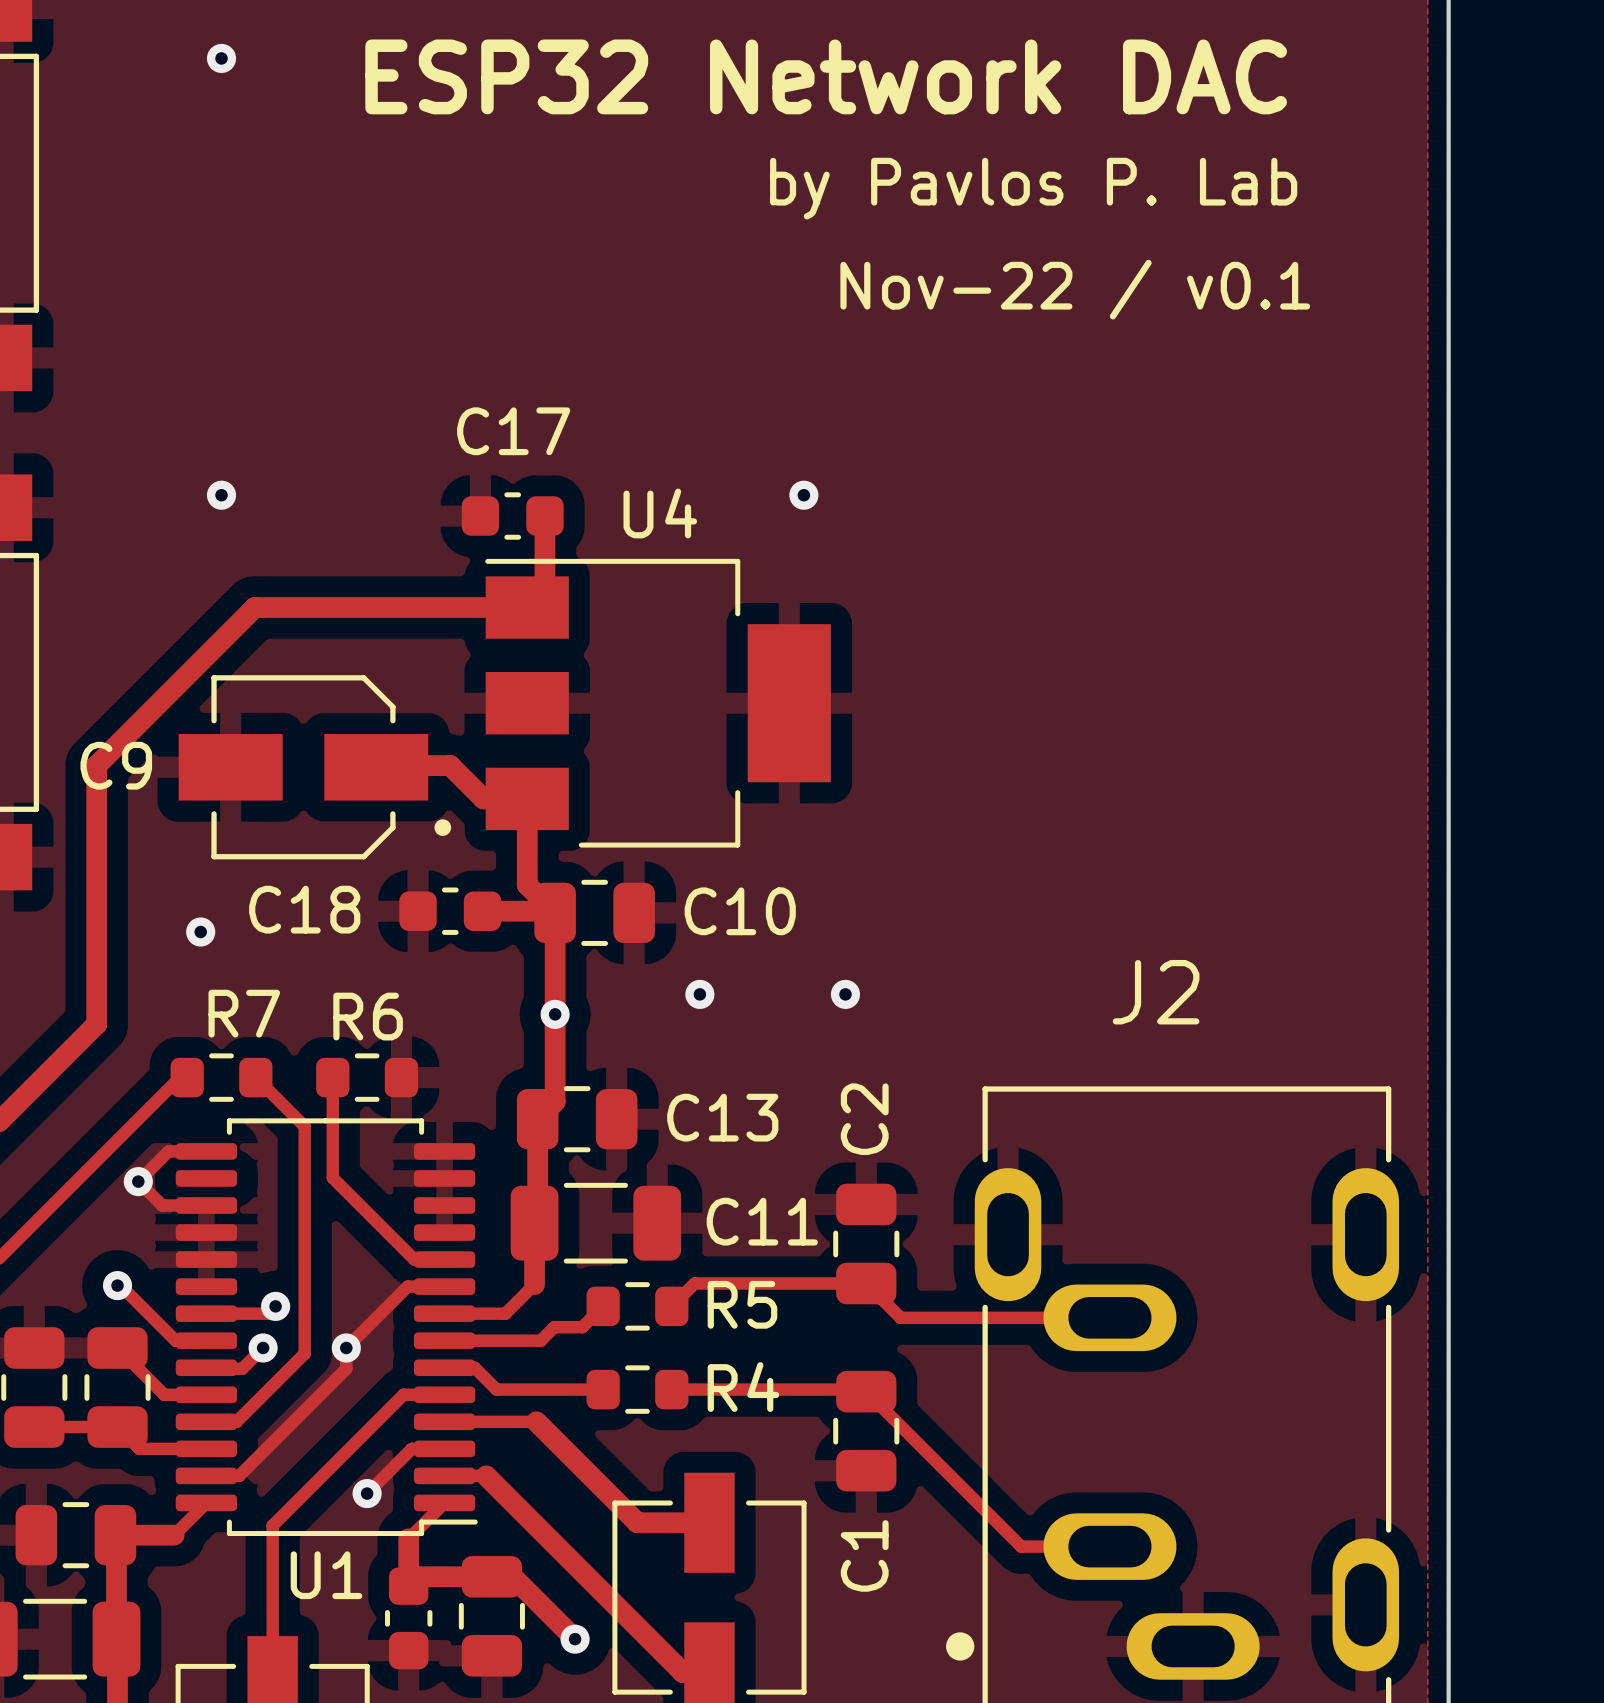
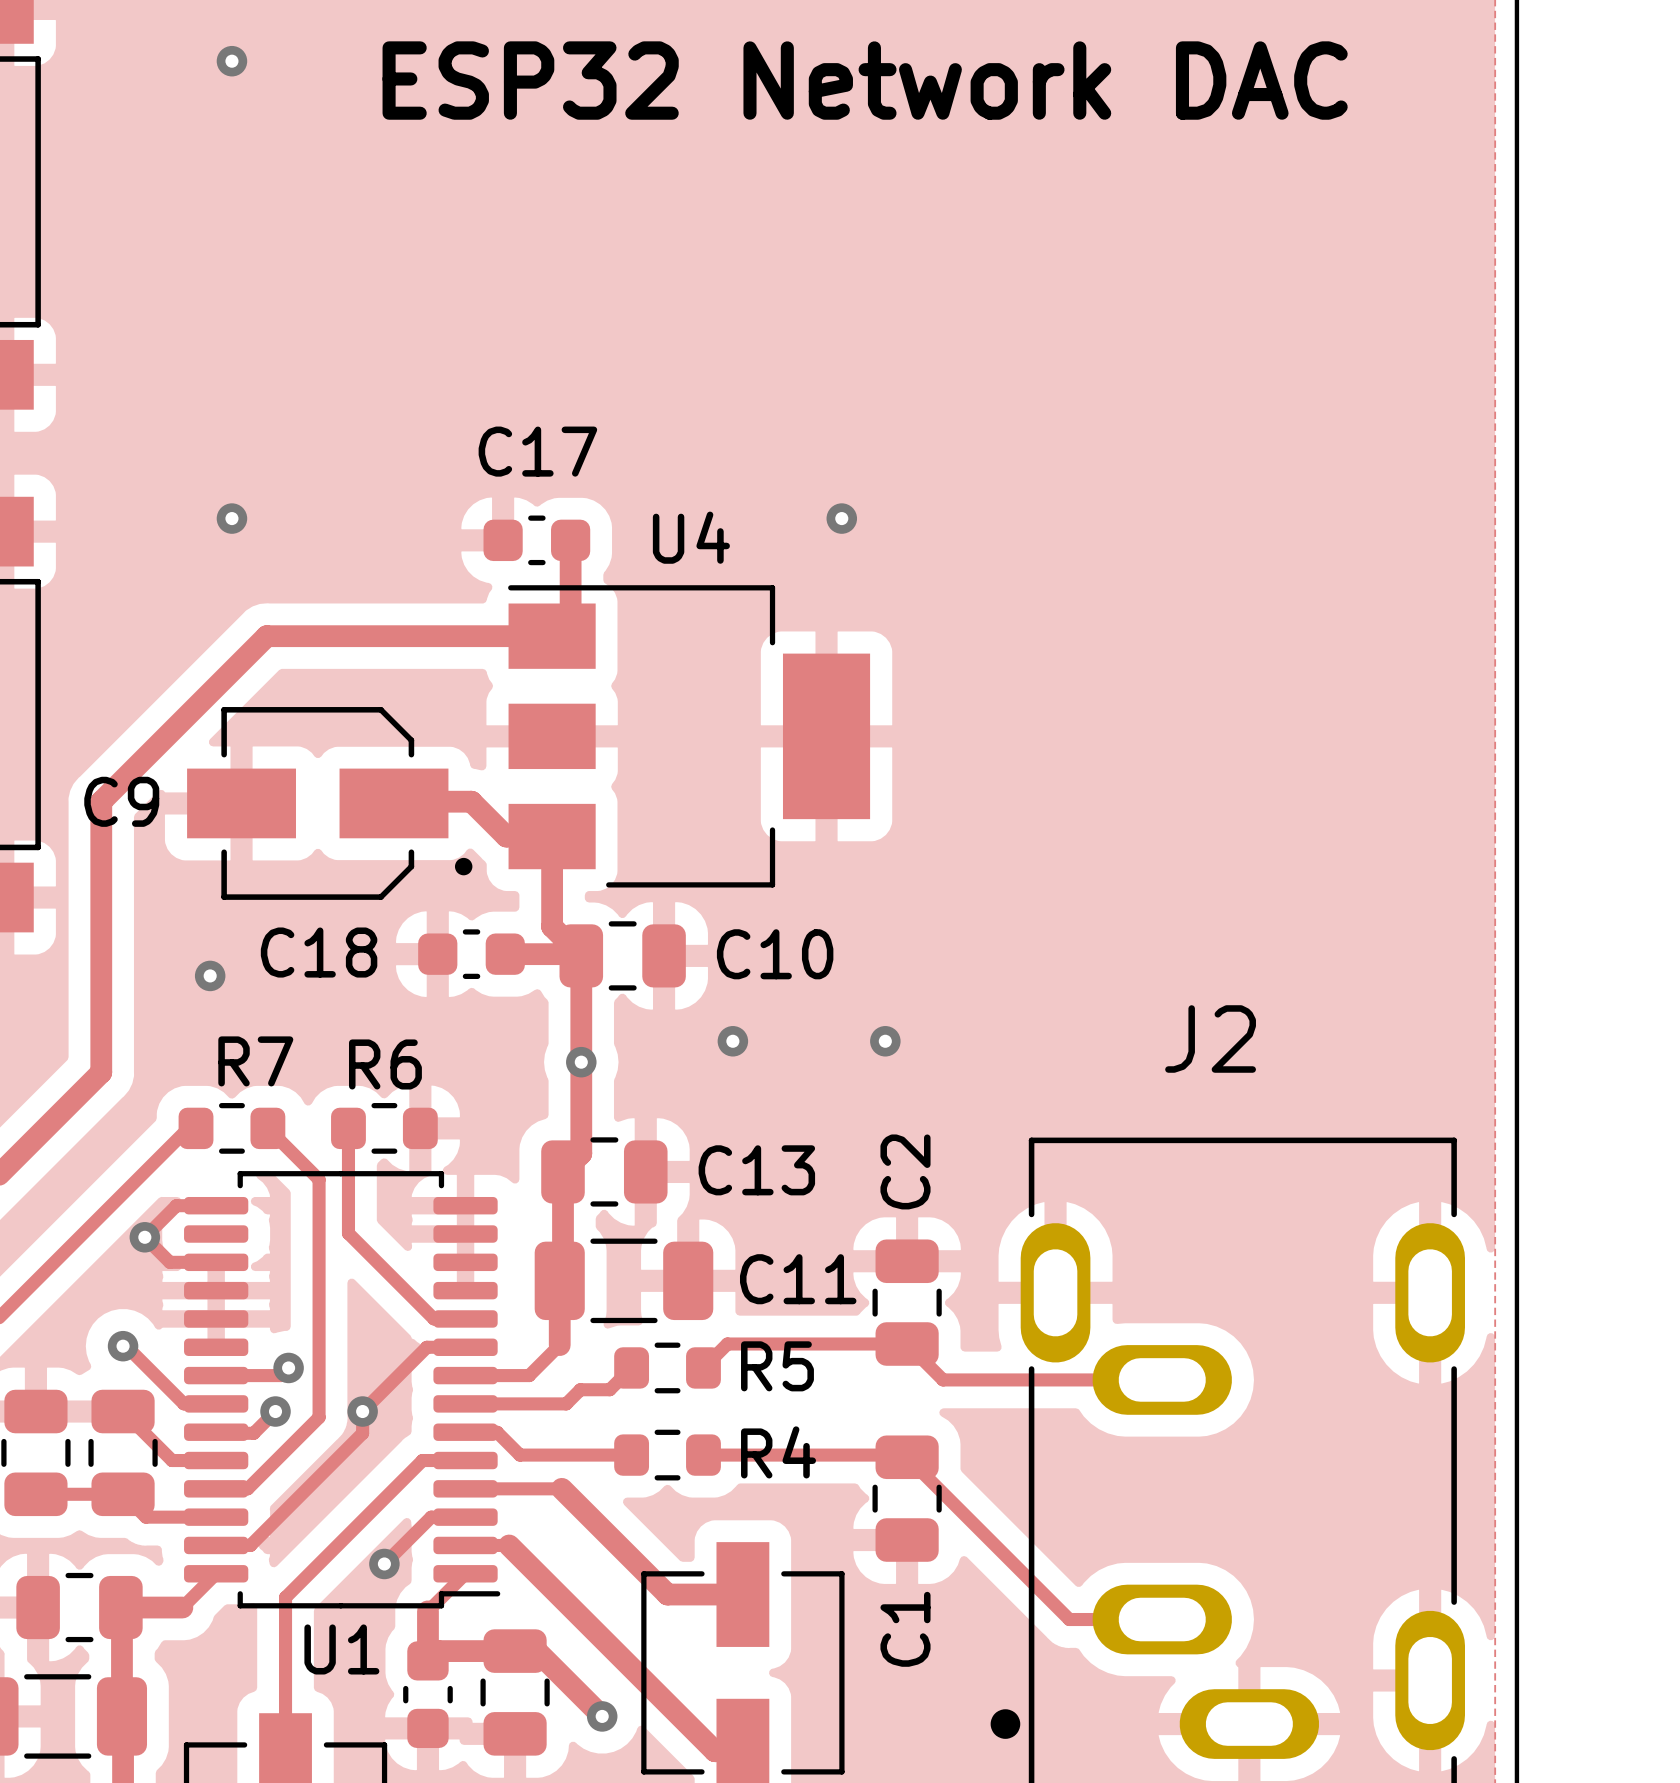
text: by Pavlos P. Lab (1033, 188) -> none
text: Nov-22 / v0.1 (1075, 289) -> none

